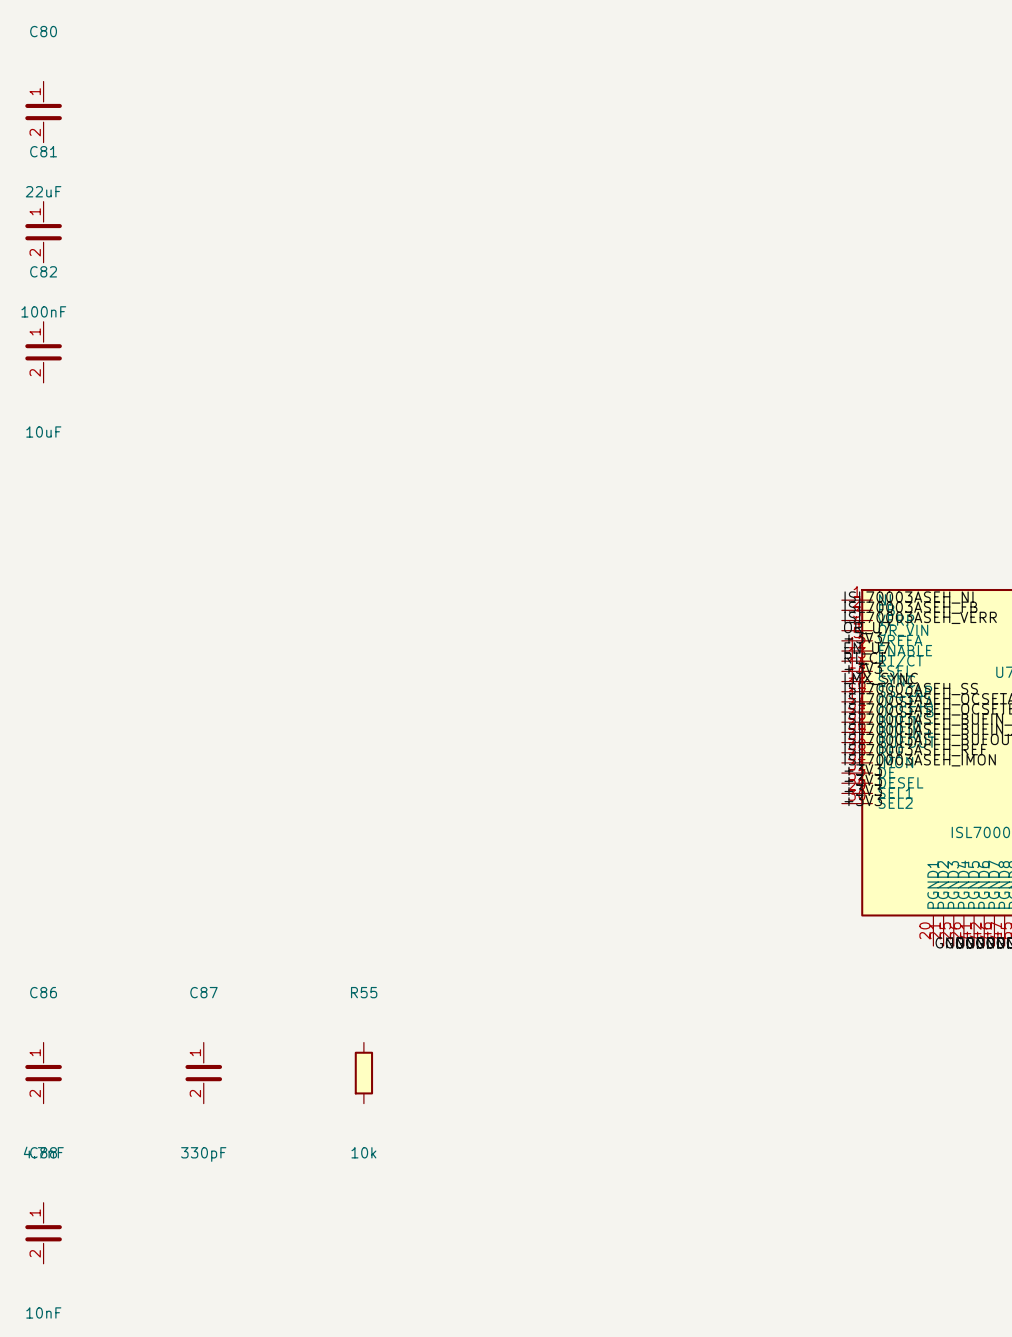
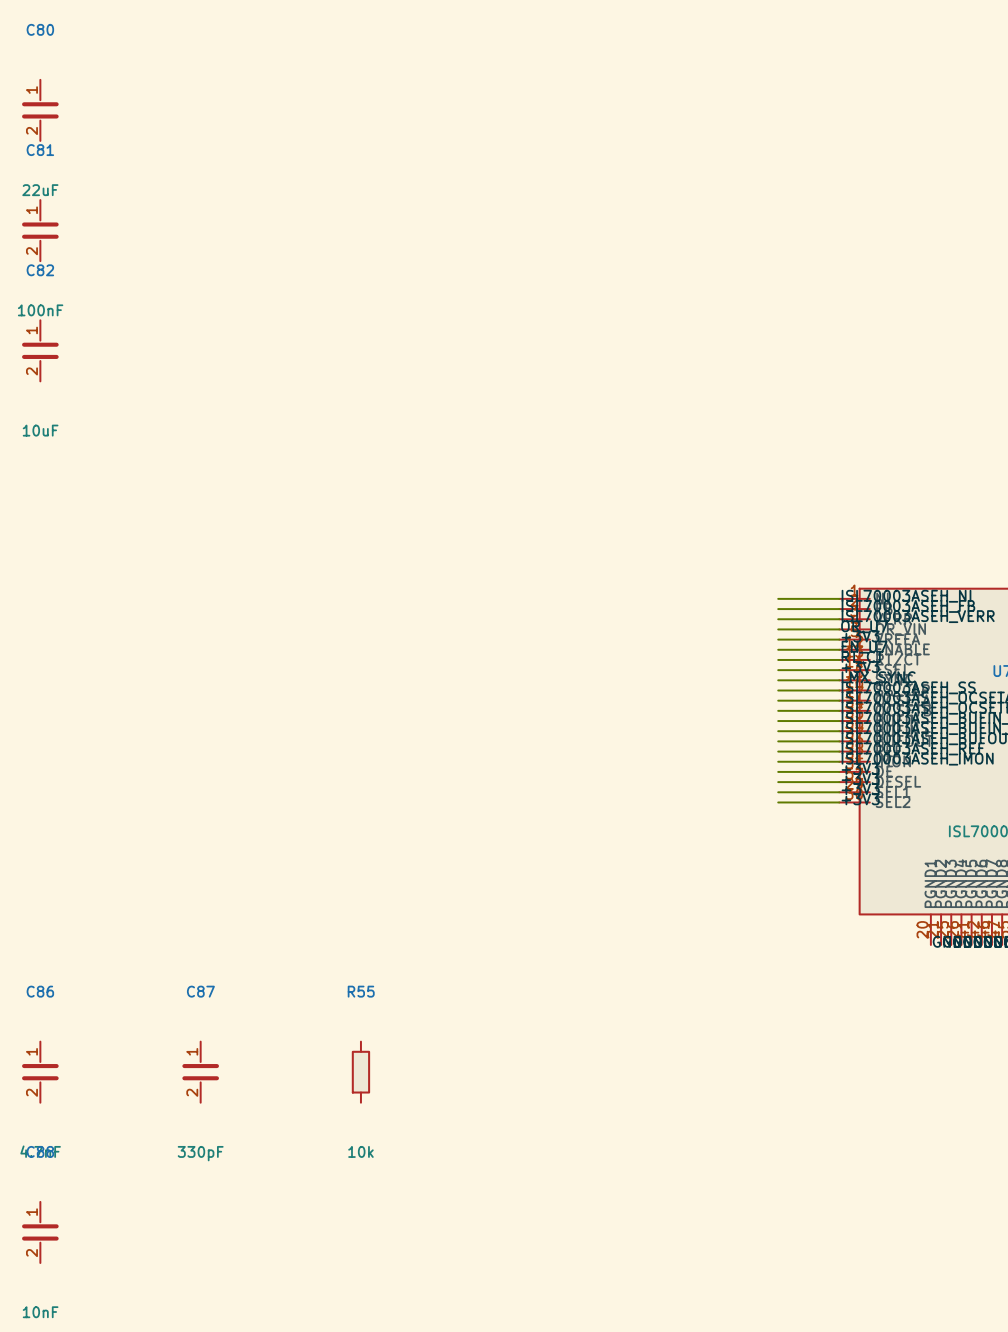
wire: none -> (778, 598) (839, 598)
wire: none -> (778, 609) (839, 609)
wire: none -> (778, 619) (839, 619)
wire: none -> (778, 629) (839, 629)
wire: none -> (778, 639) (839, 639)
wire: none -> (778, 649) (839, 649)
wire: none -> (778, 659) (839, 659)
wire: none -> (778, 670) (839, 670)
wire: none -> (778, 680) (839, 680)
wire: none -> (778, 690) (839, 690)
wire: none -> (778, 700) (839, 700)
wire: none -> (778, 710) (839, 710)
wire: none -> (778, 721) (839, 721)
wire: none -> (778, 731) (839, 731)
wire: none -> (778, 741) (839, 741)
wire: none -> (778, 751) (839, 751)
wire: none -> (778, 761) (839, 761)
wire: none -> (778, 771) (839, 771)
wire: none -> (778, 782) (839, 782)
wire: none -> (778, 792) (839, 792)
wire: none -> (778, 802) (839, 802)

